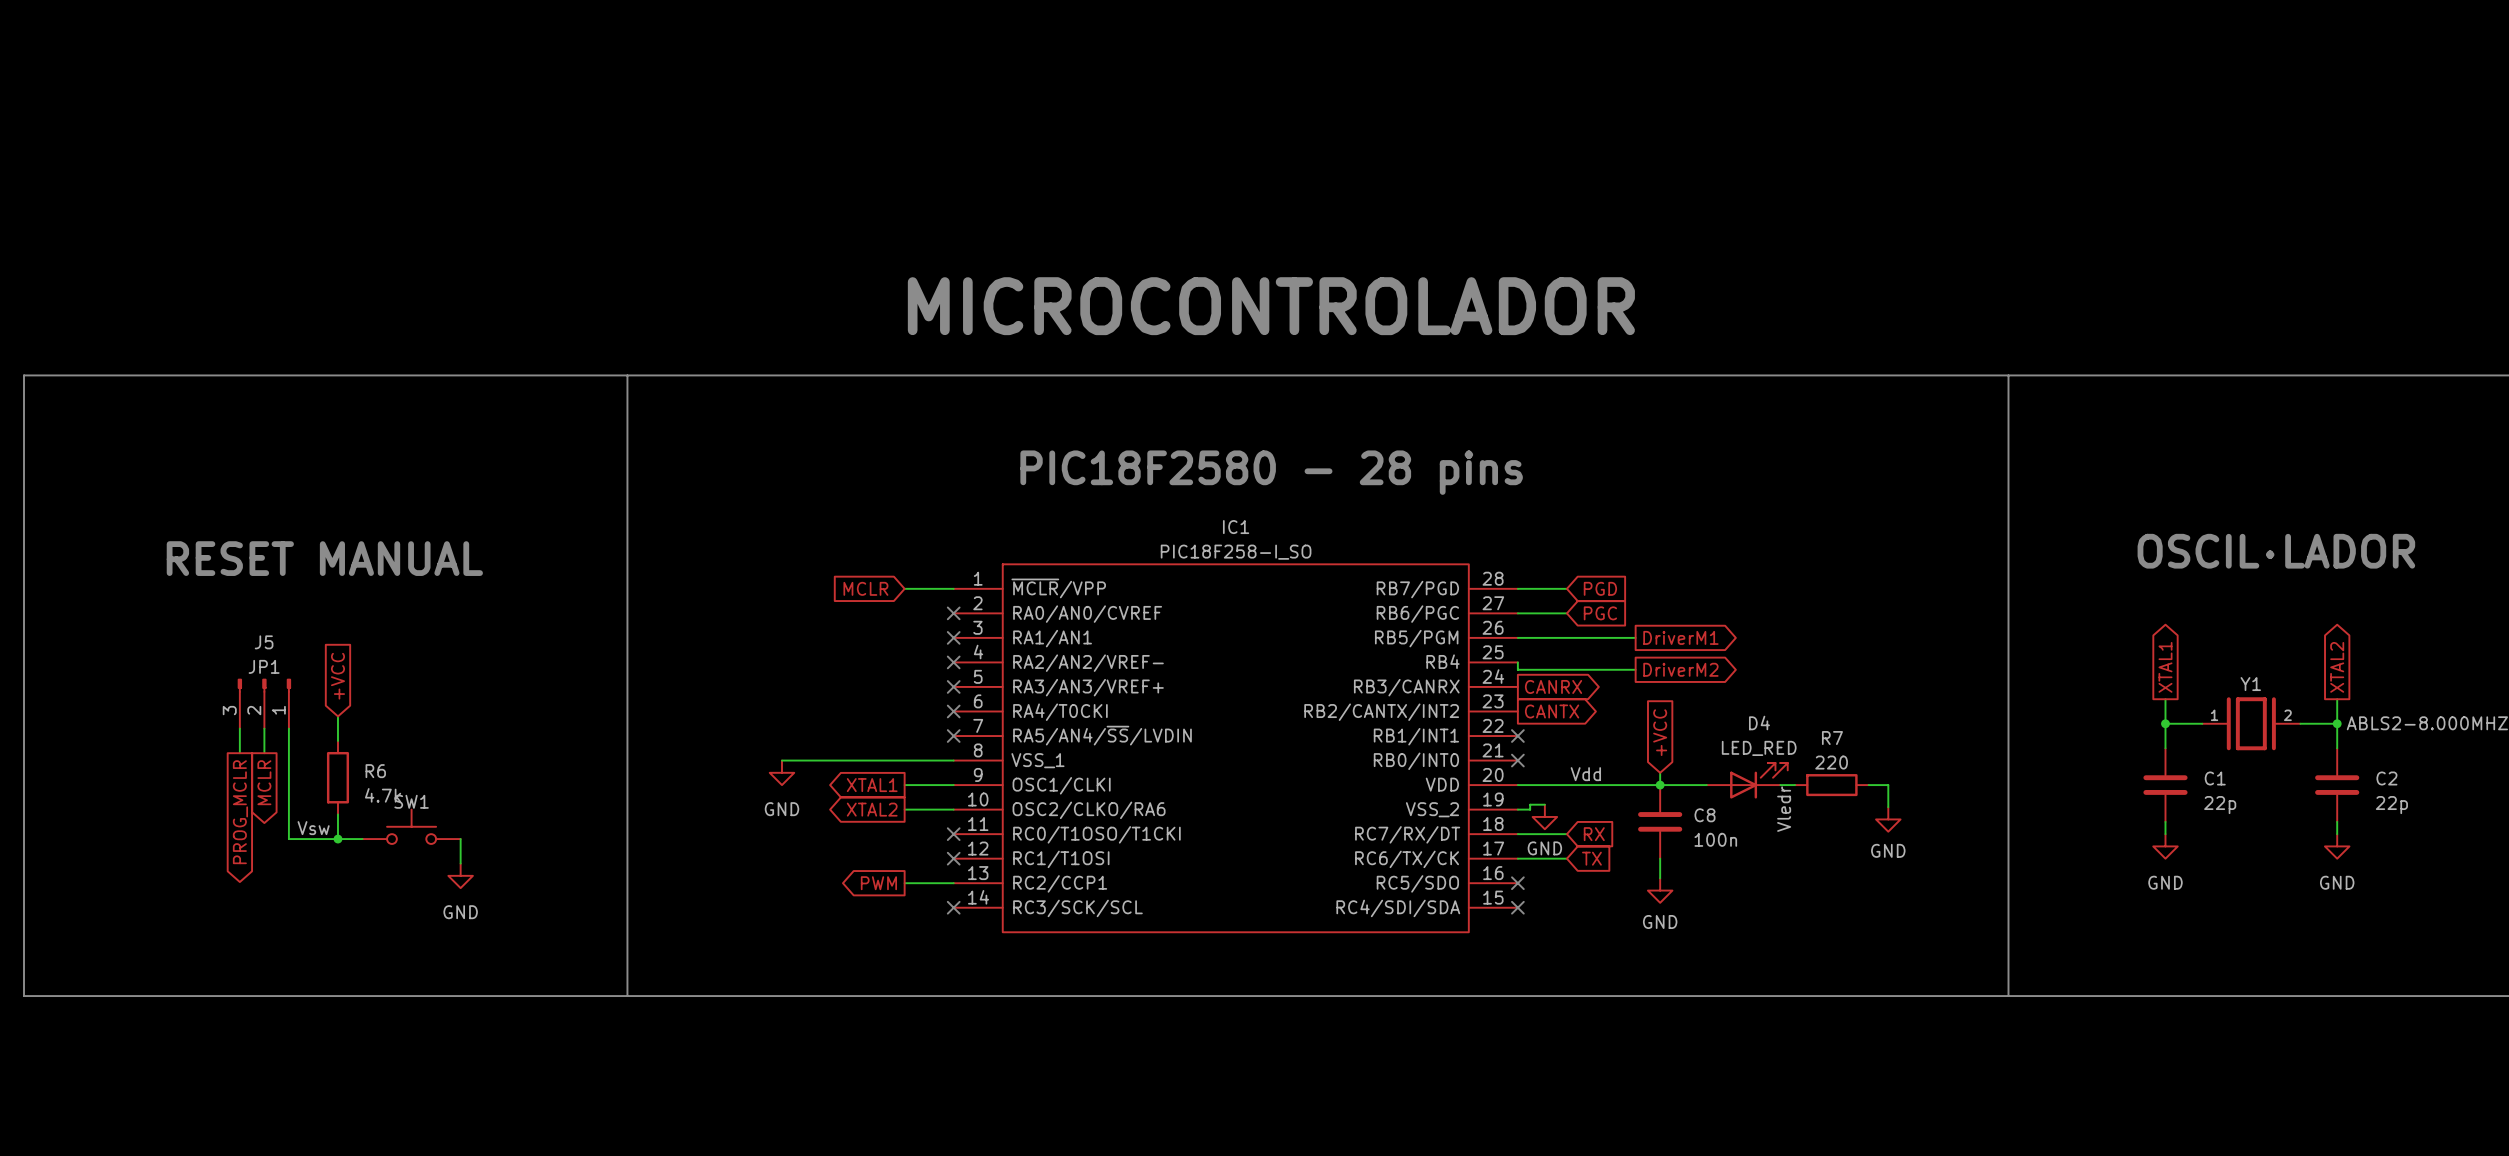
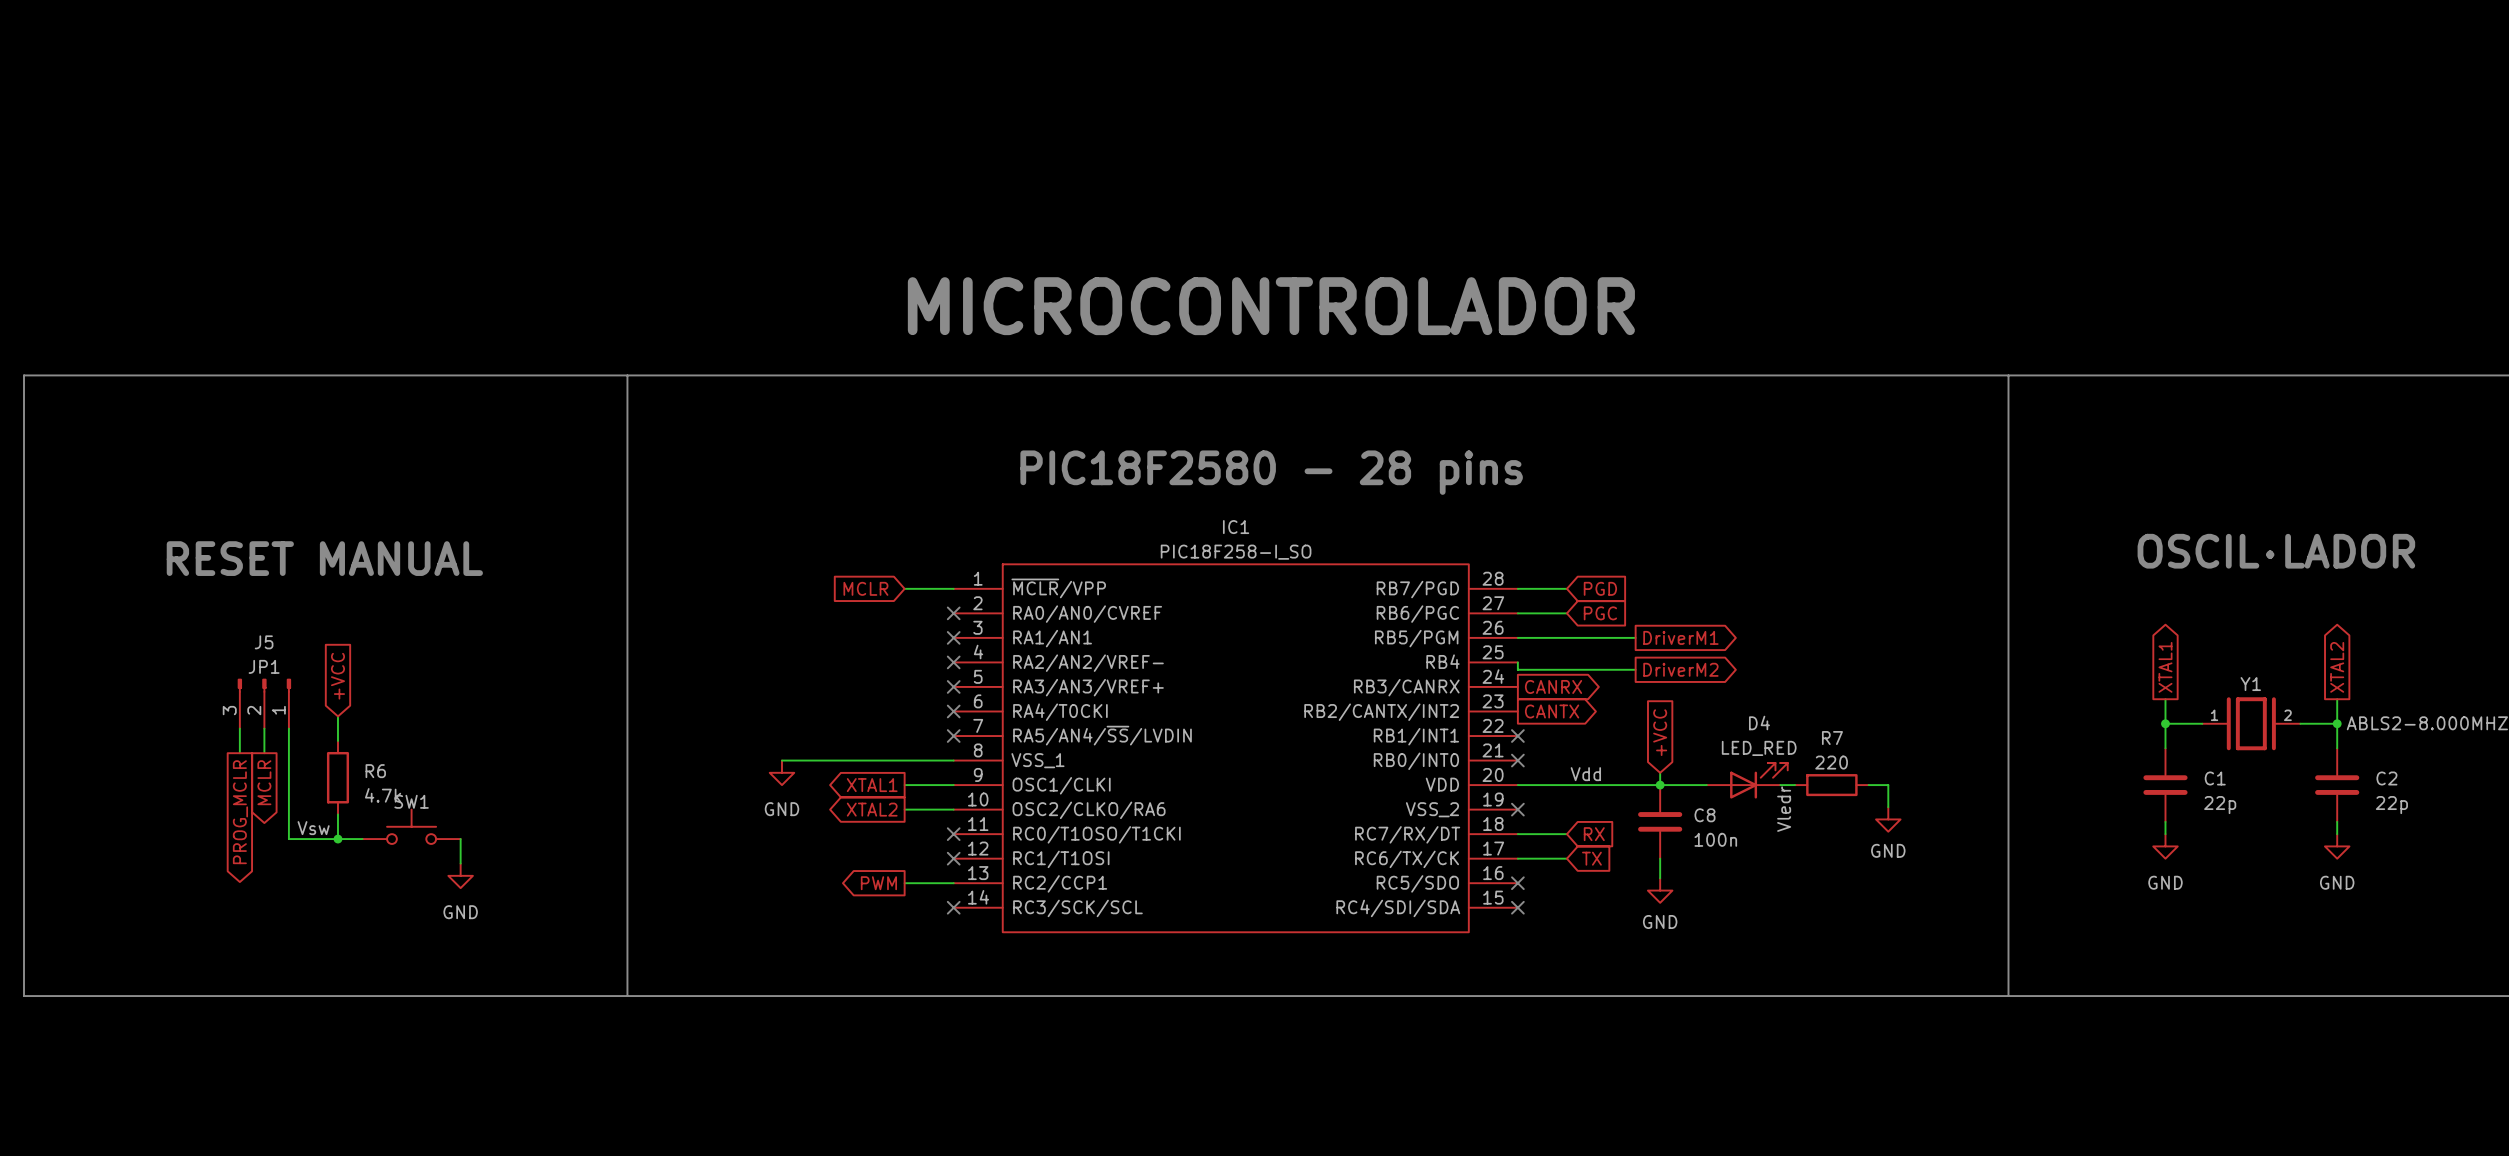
wire: (1544, 804) (1530, 804) (1530, 809) (1517, 809) -> none
no-connect mark: none -> (1517, 809)
power symbol: GND (1544, 816) -> none

